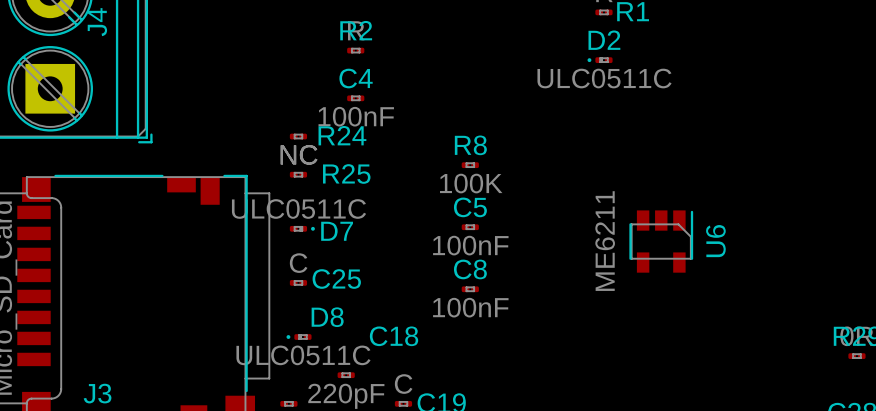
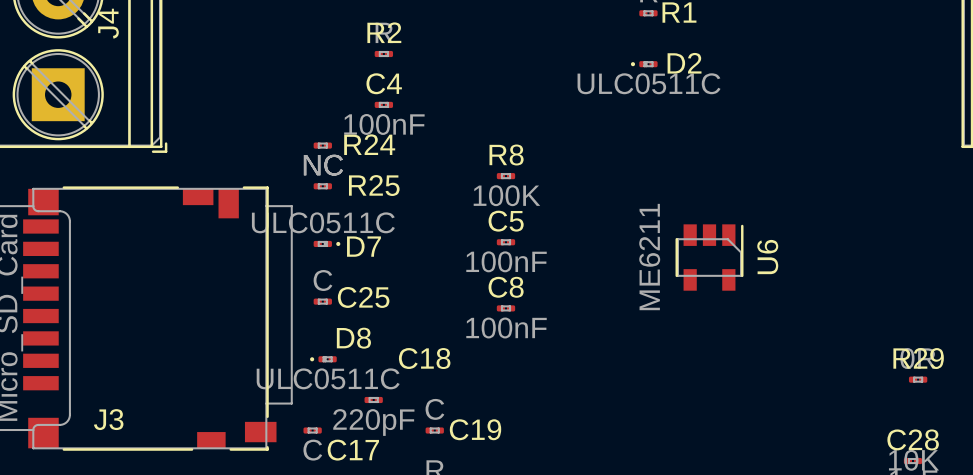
D2 name position: D2 (604, 40) -> D2 (684, 63)

